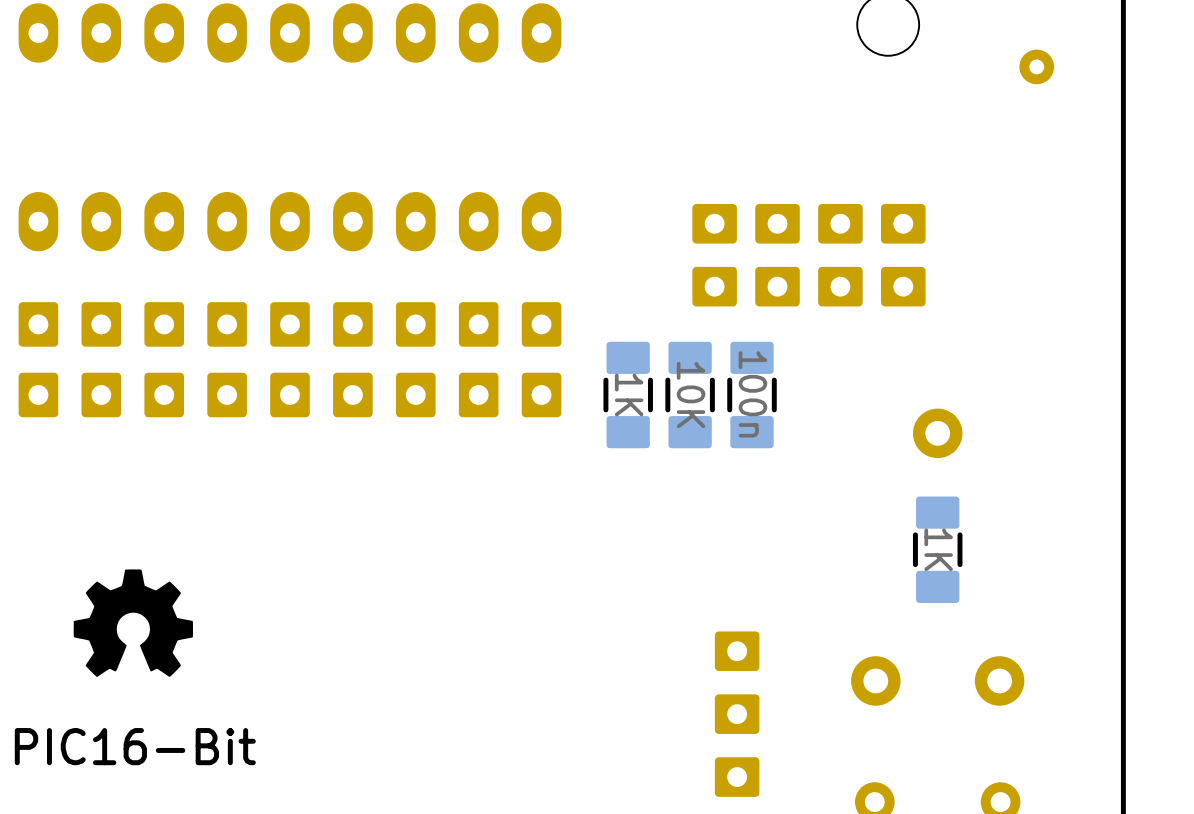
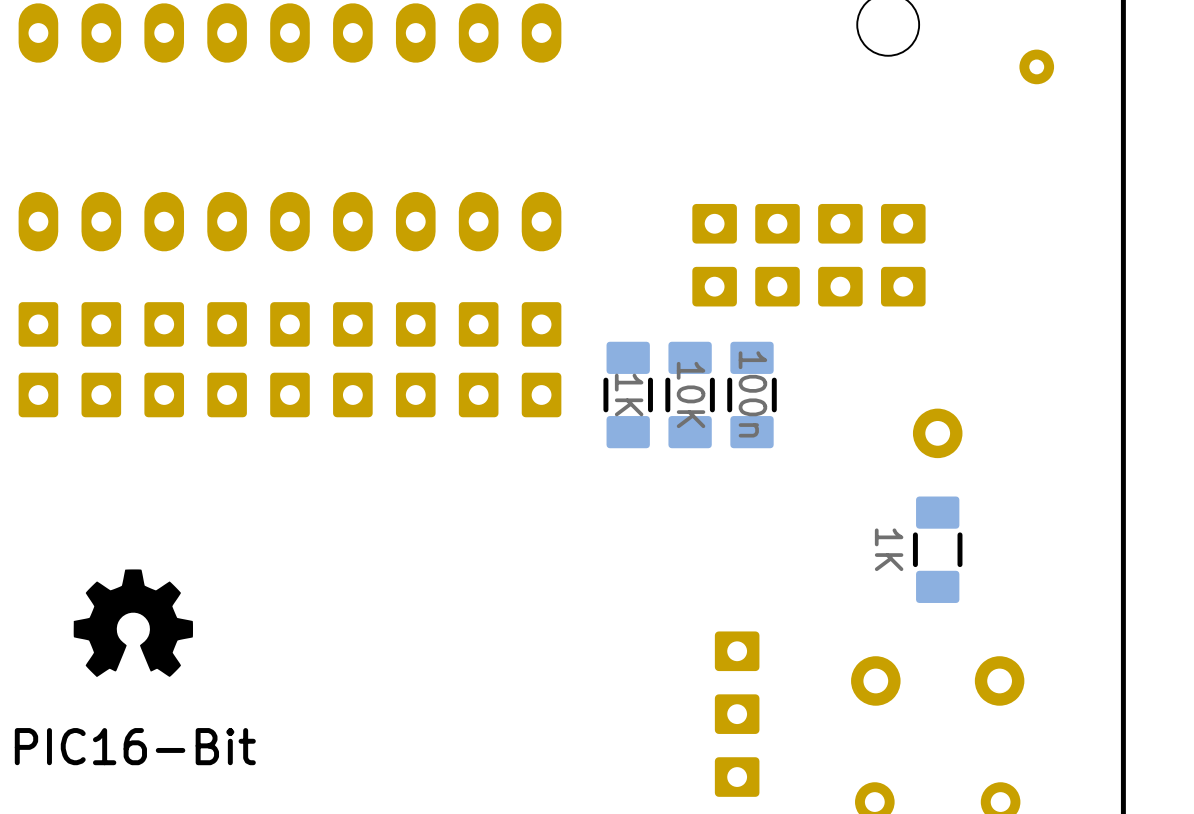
part value position: 1K (938, 549) -> 1K (889, 549)

